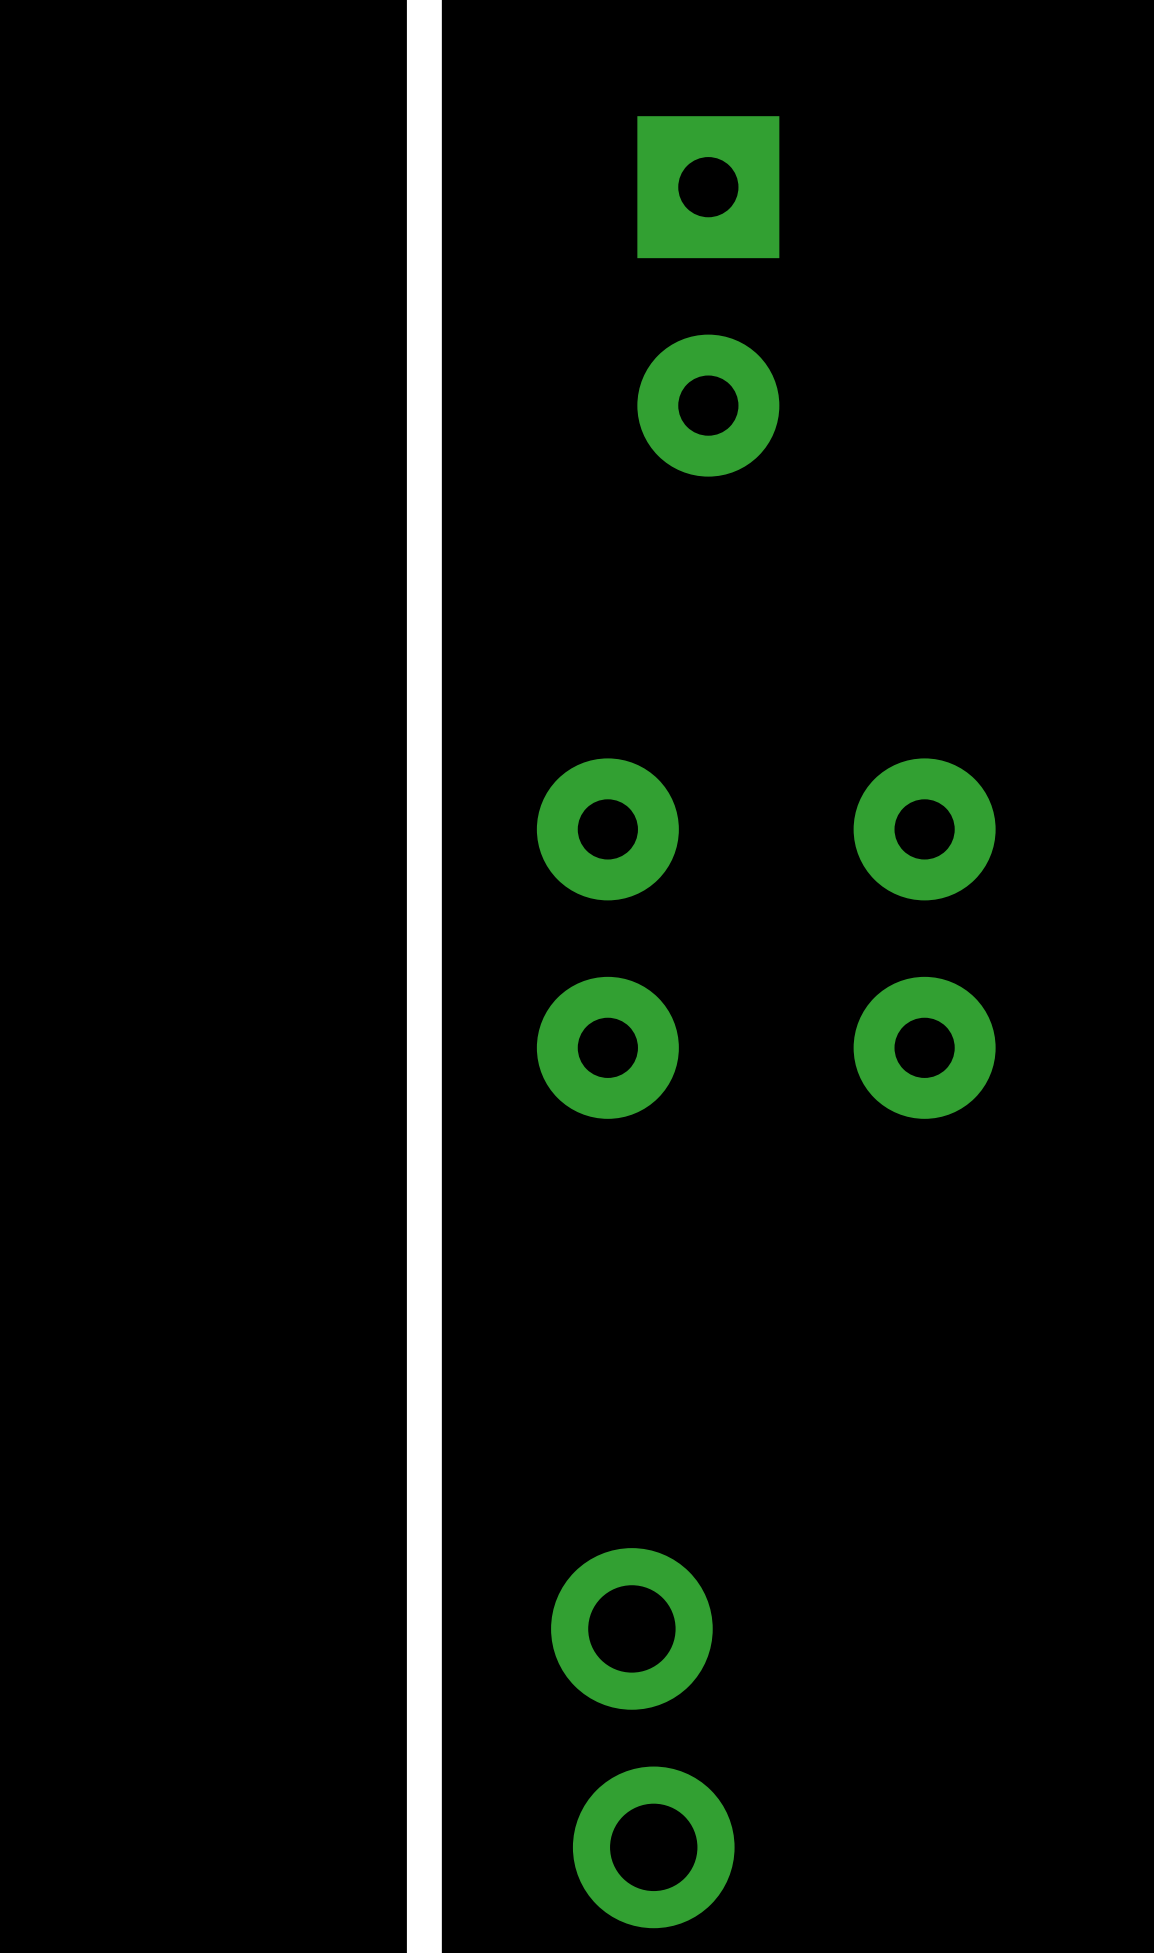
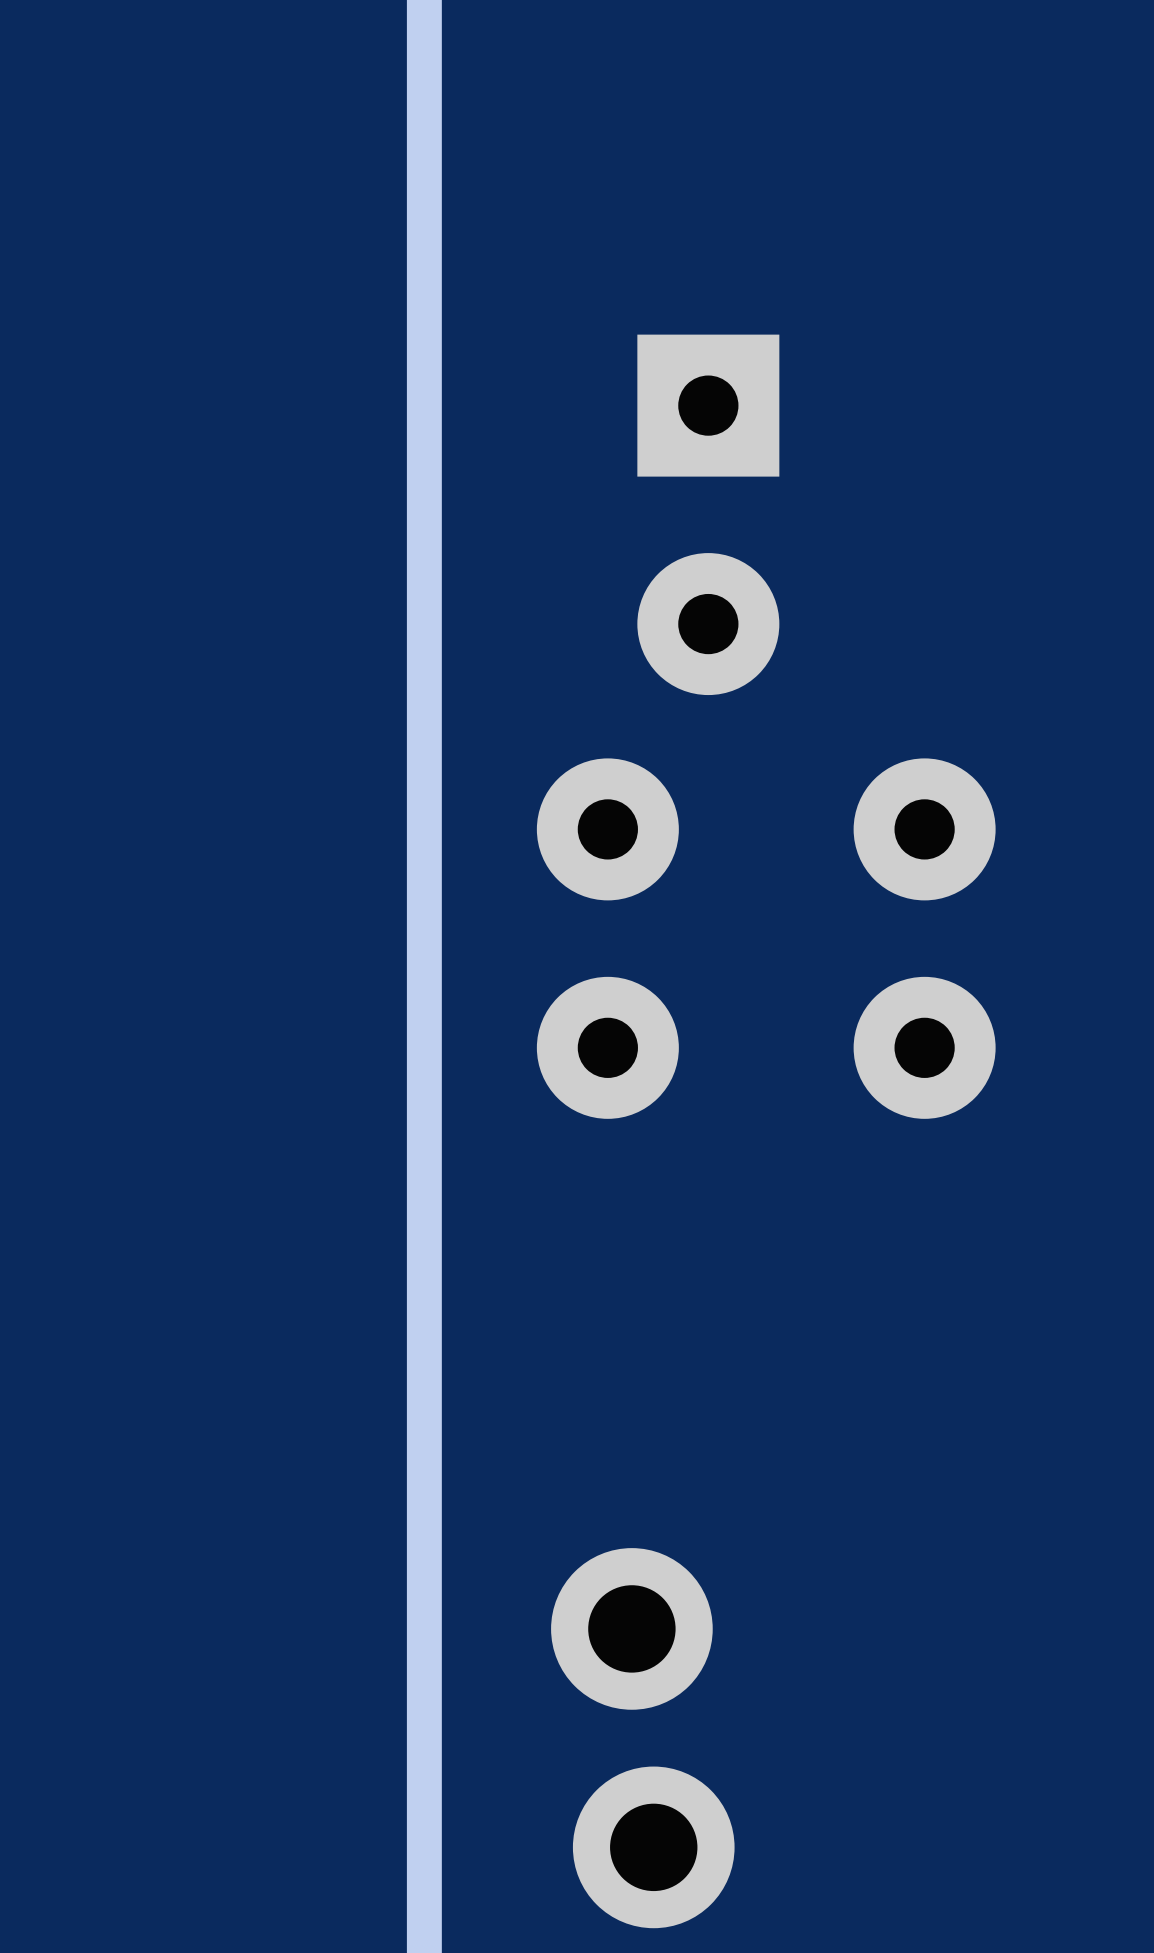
part position: (708, 296) -> (708, 514)

